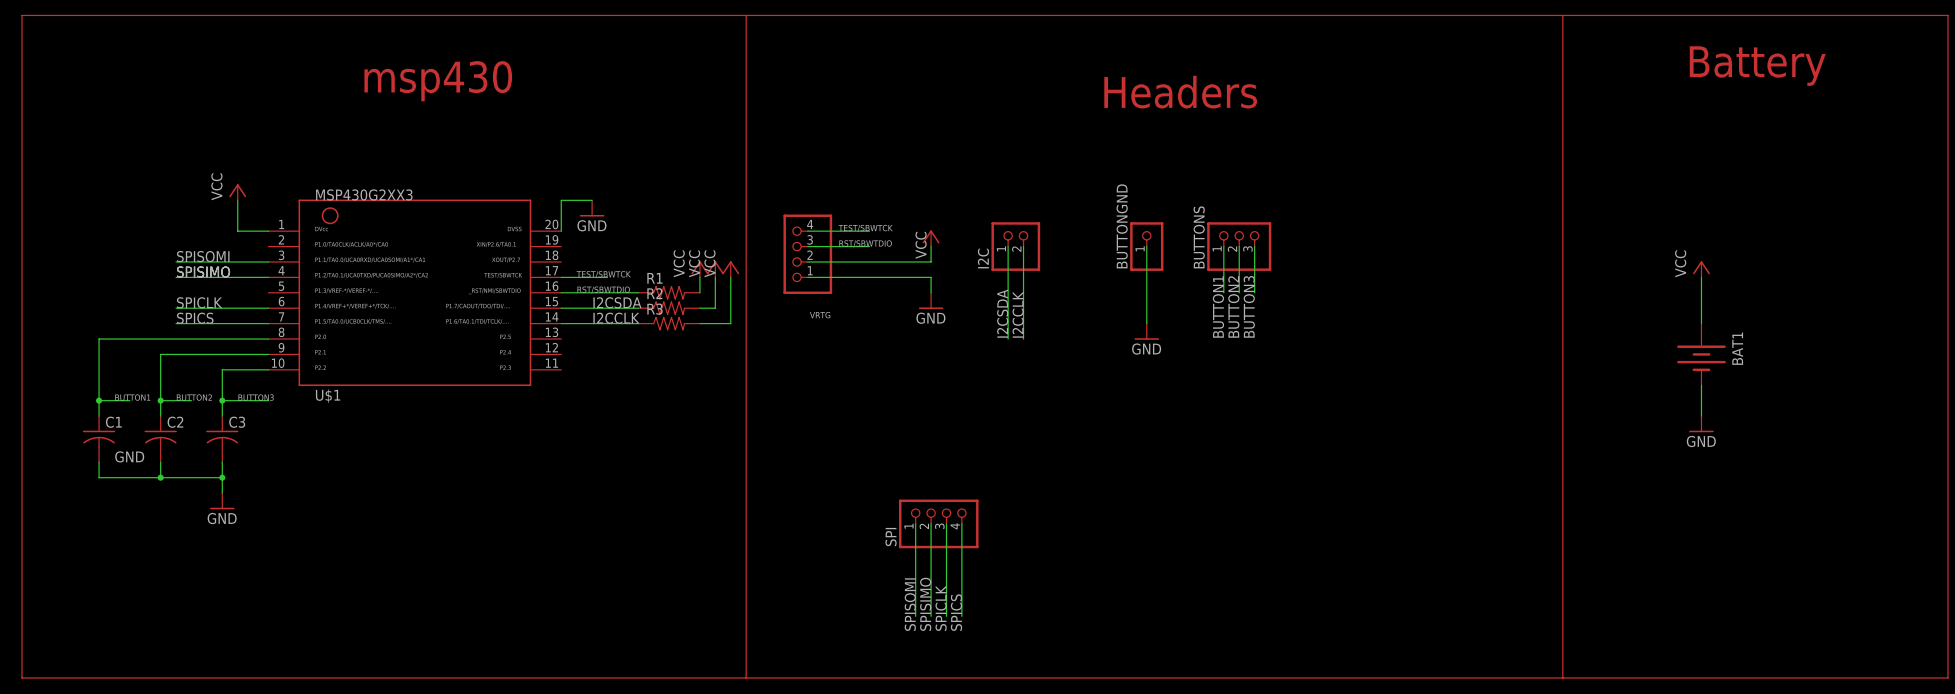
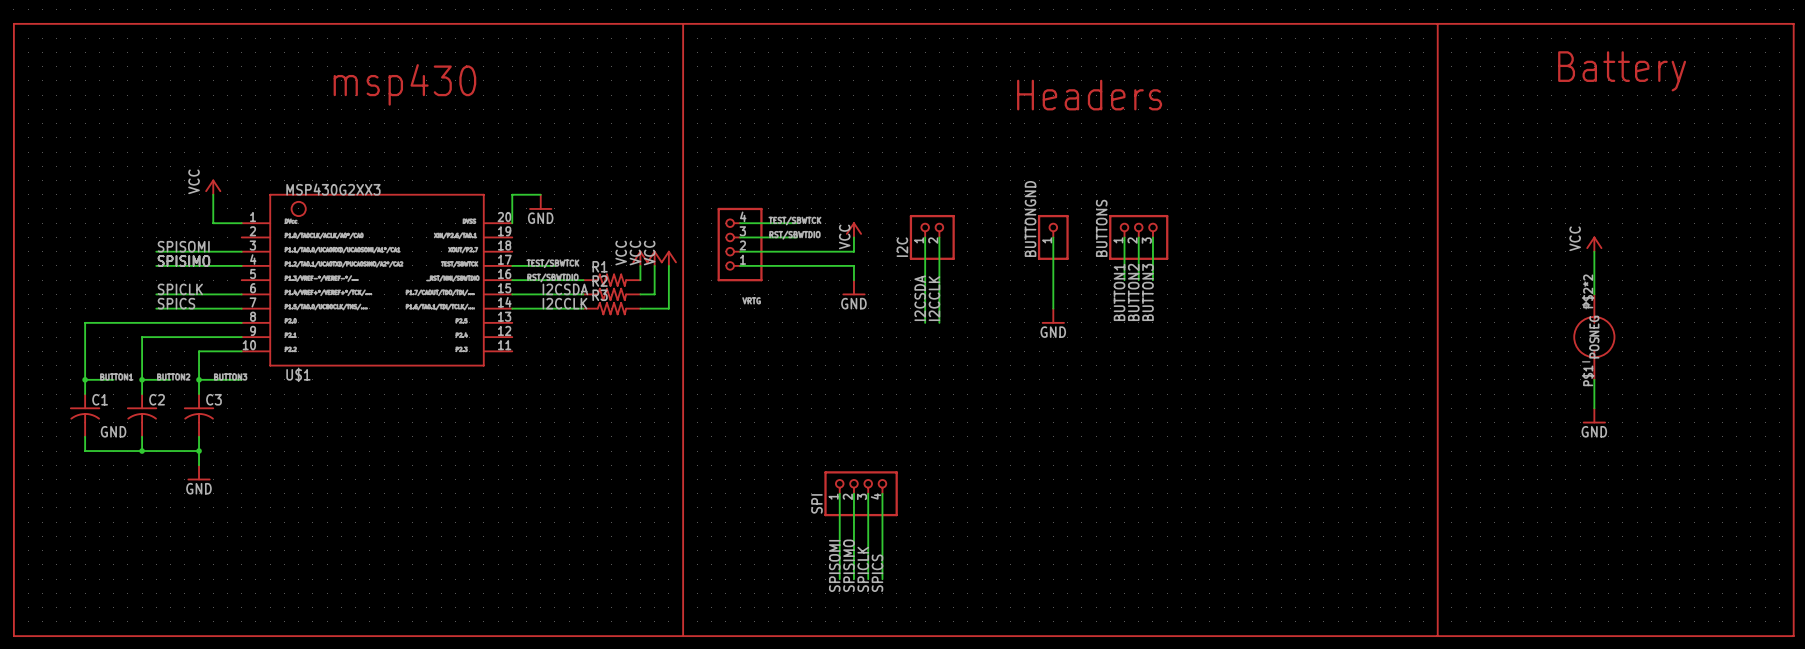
power symbol position: VCC (1701, 269) -> VCC (1594, 244)
wire: (1701, 277) (1701, 323) -> (1594, 251) (1594, 294)
BAT1: (1701, 354) -> none
part: none -> (1594, 337)
wire: (1701, 385) (1701, 416) -> (1594, 379) (1594, 408)
power symbol position: GND (1701, 424) -> GND (1594, 415)

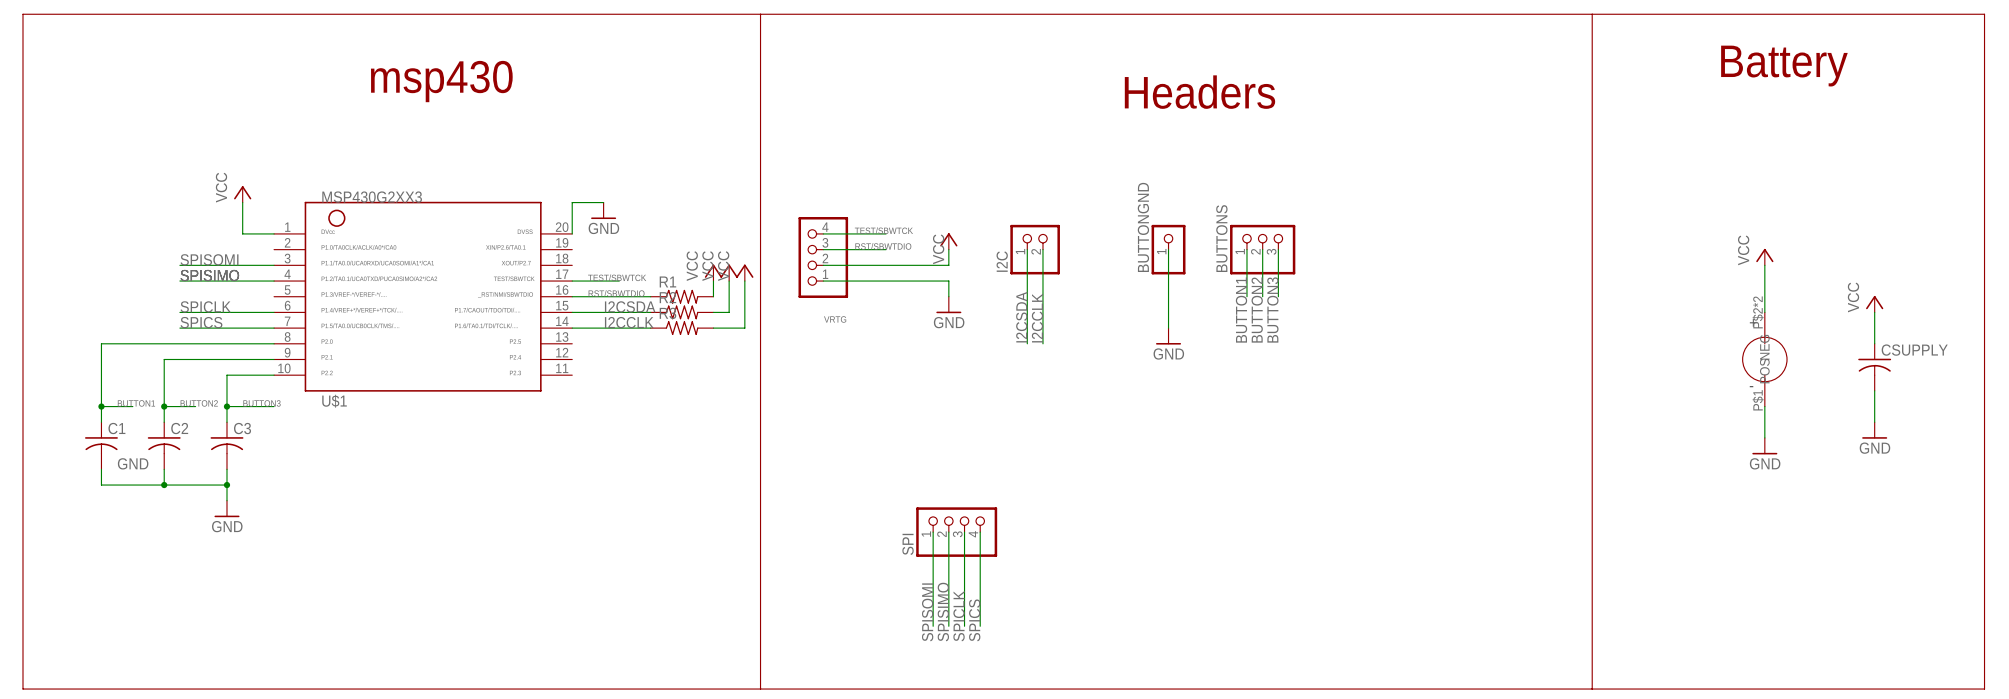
power symbol: none -> VCC (1874, 304)
wire: none -> (1874, 312) (1874, 343)
CSUPPLY: none -> (1874, 367)
wire: none -> (1874, 390) (1874, 422)
power symbol: none -> GND (1874, 430)

